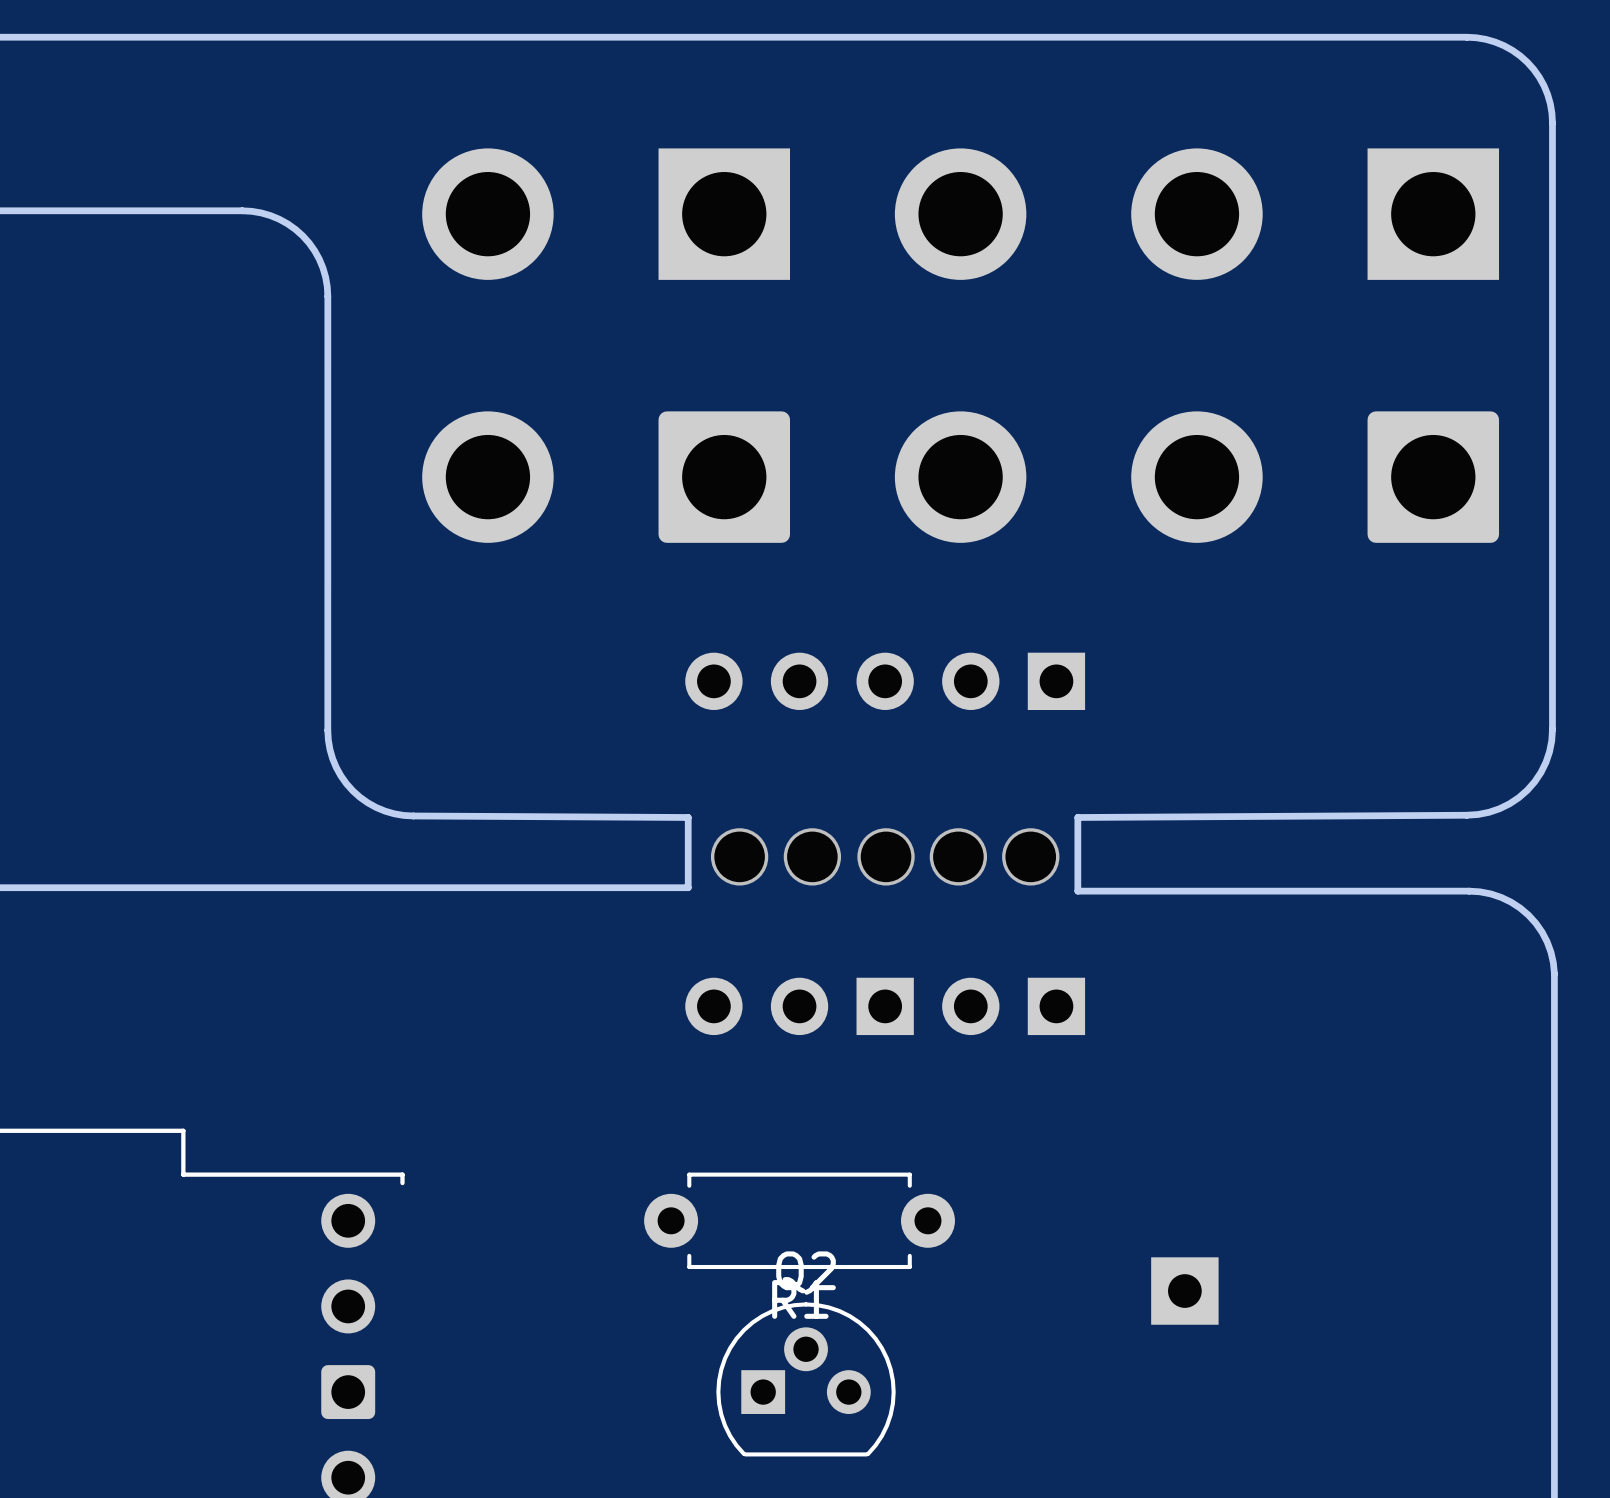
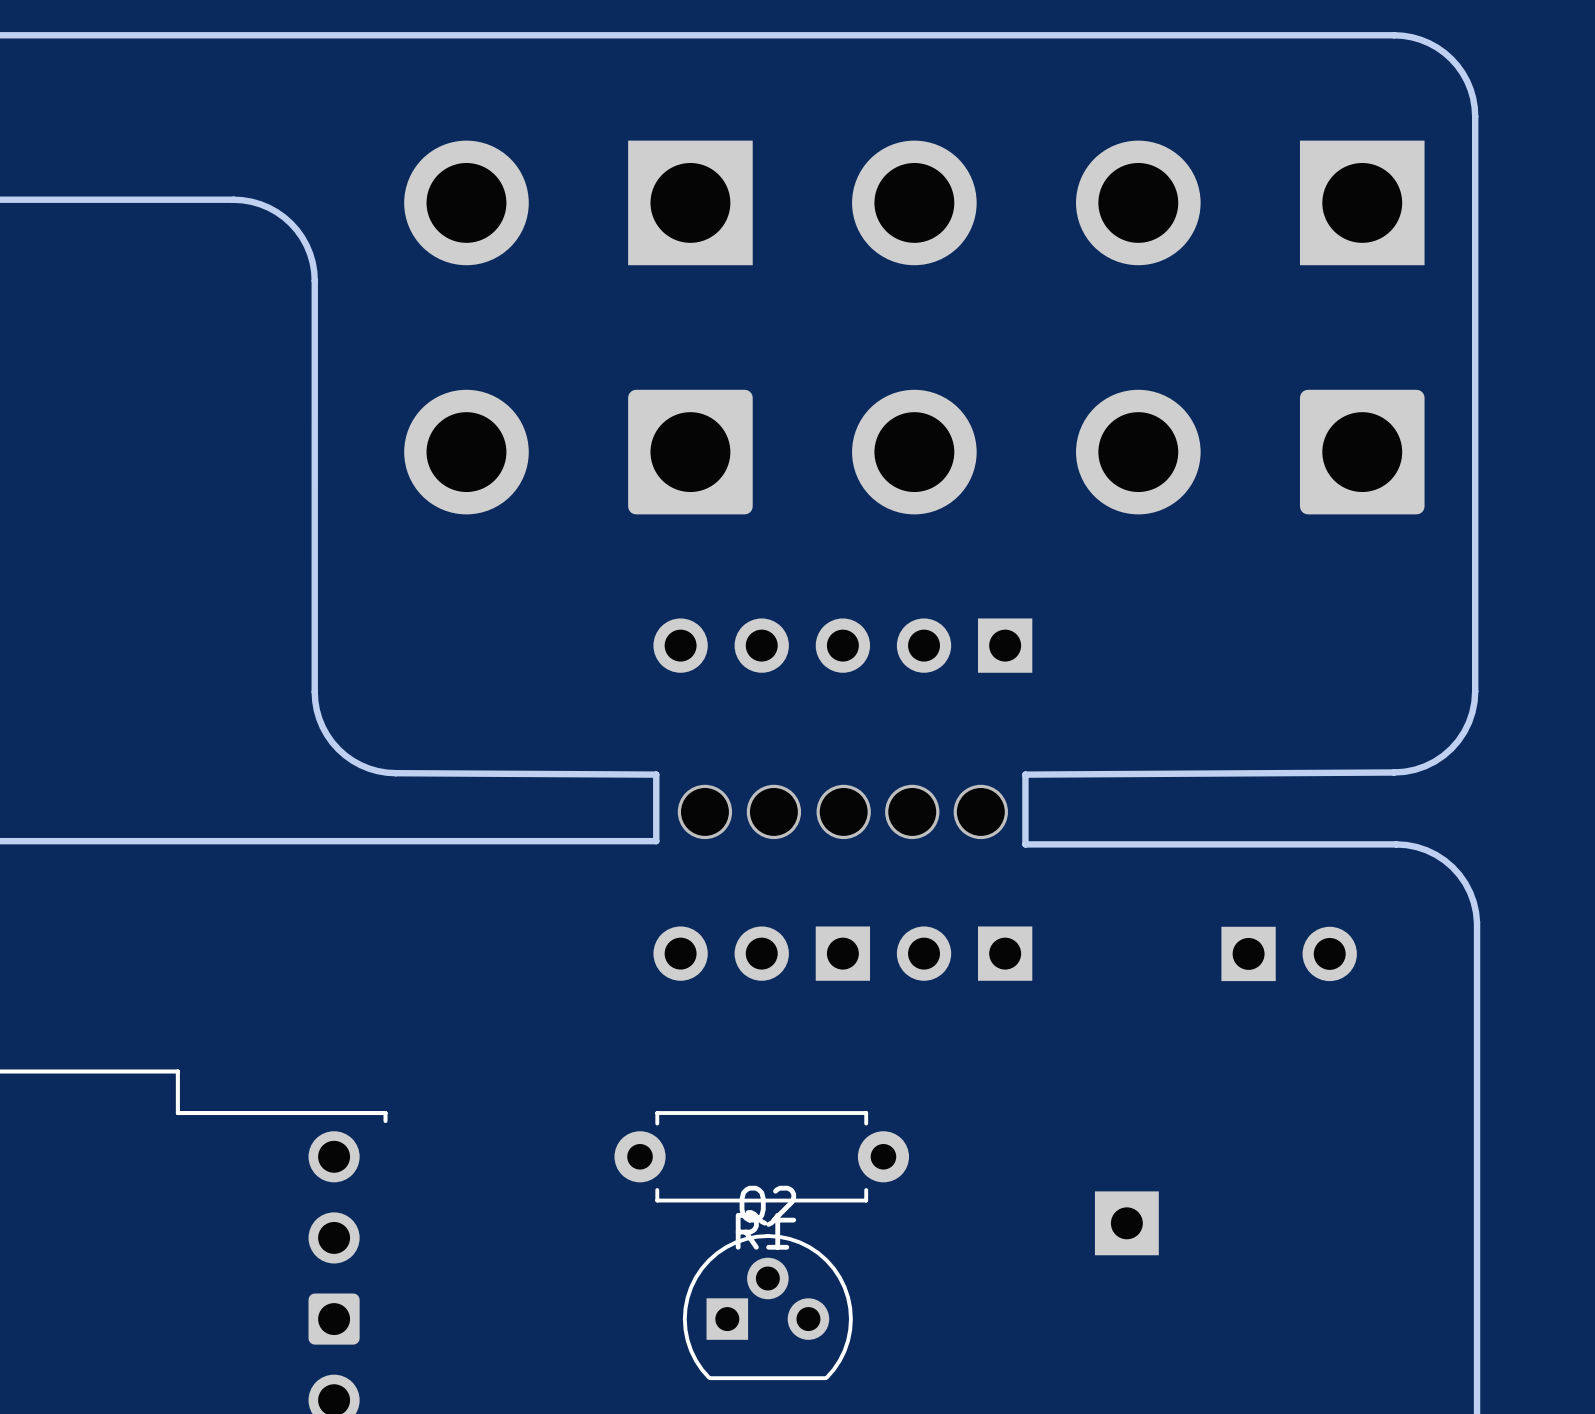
part: none -> (1289, 953)

